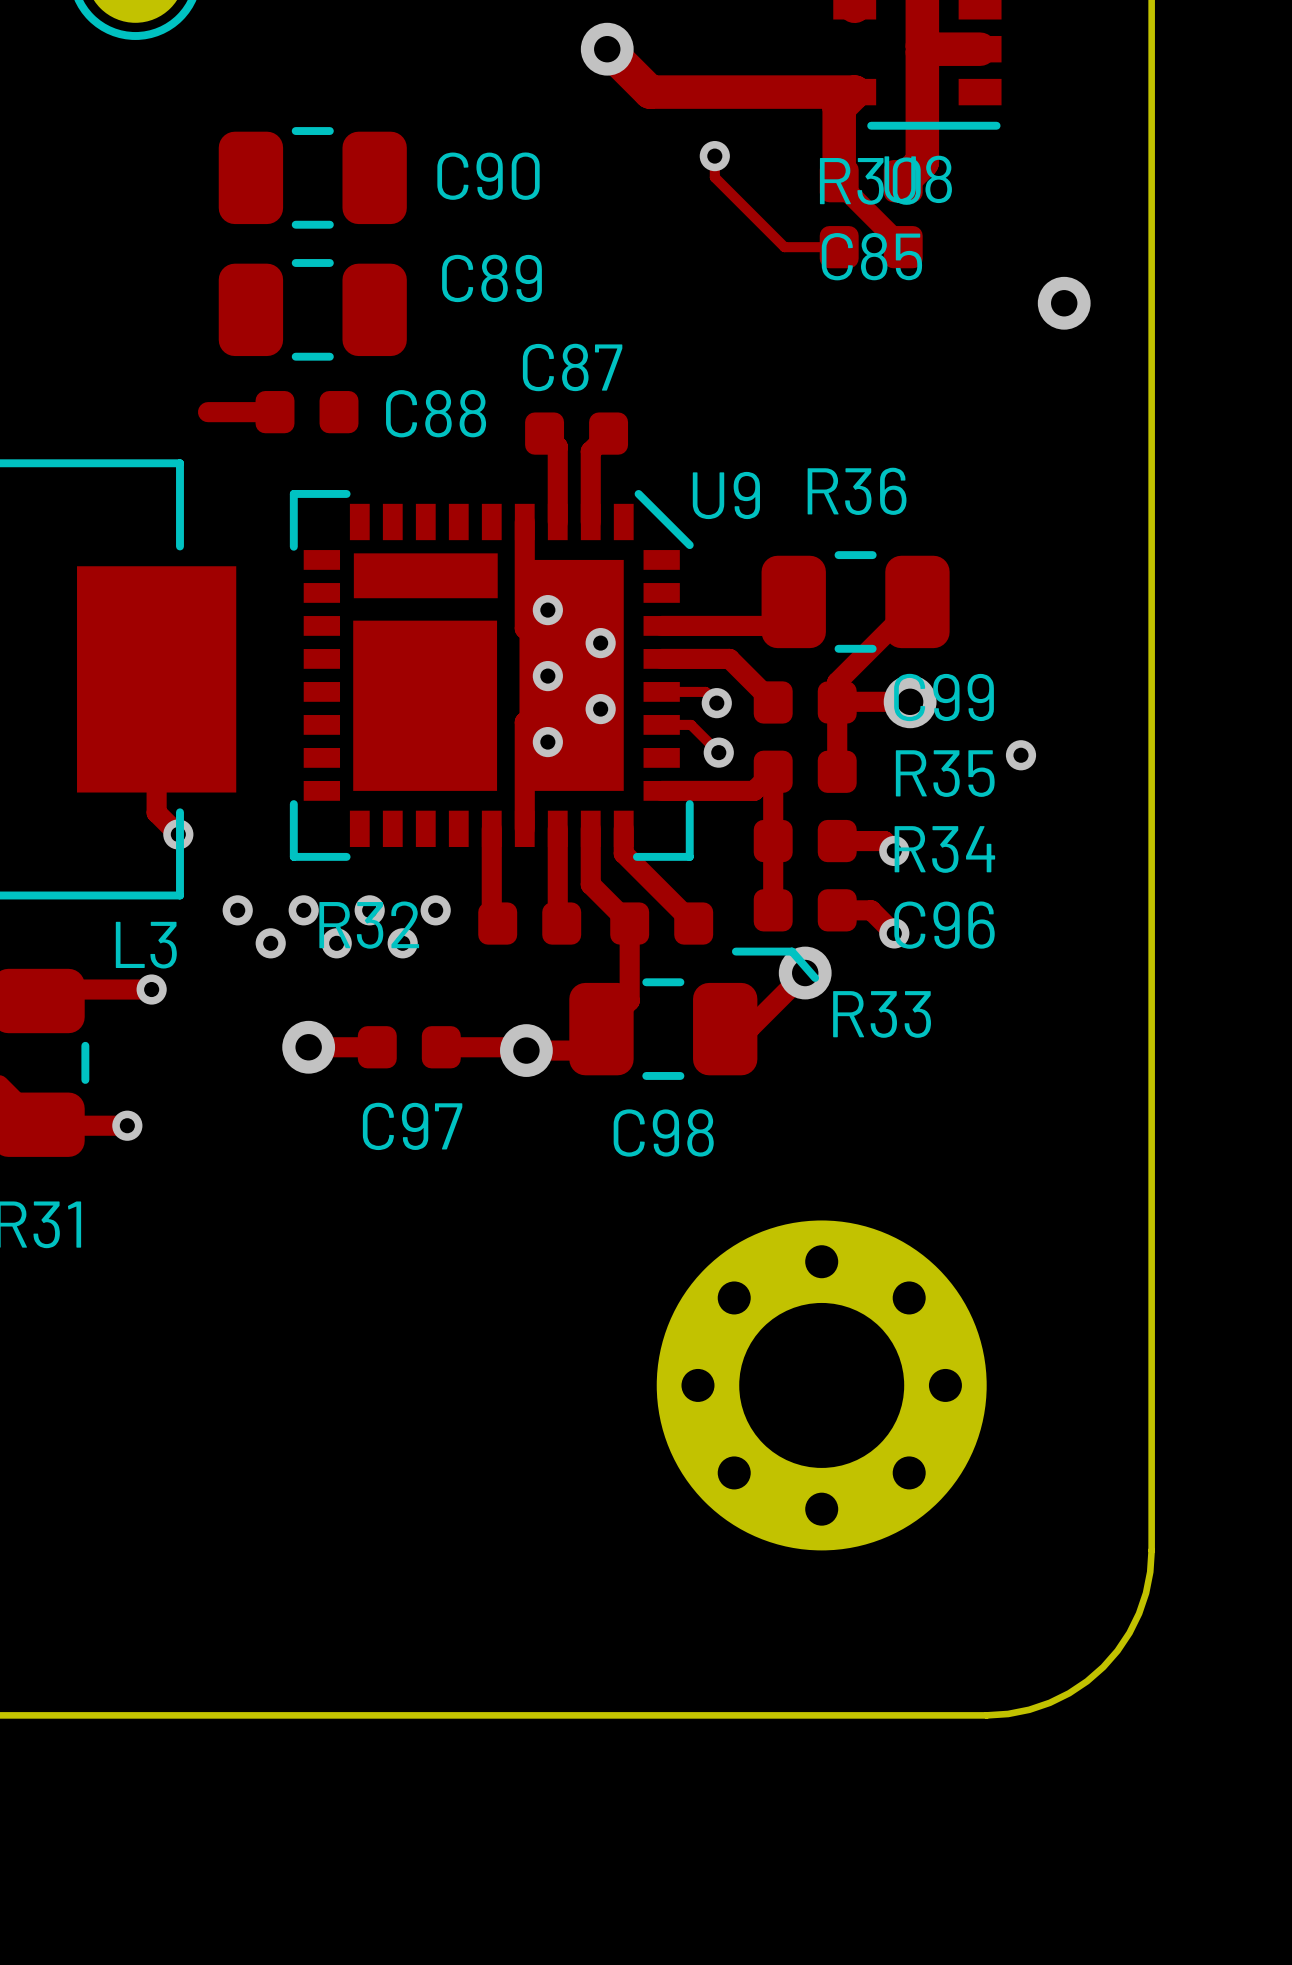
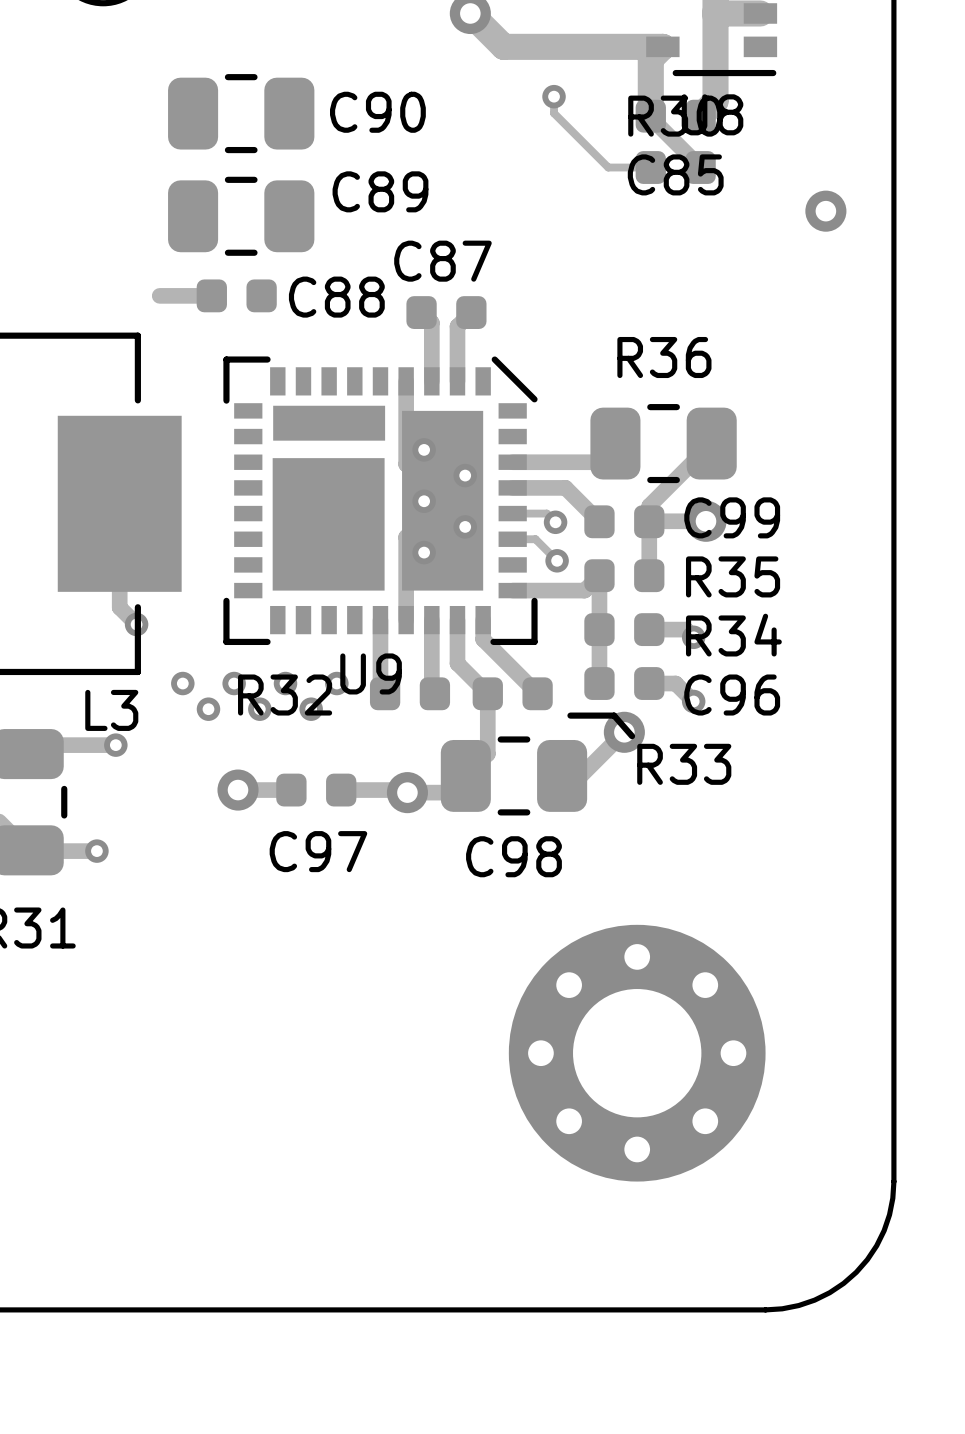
U9 name position: U9 (726, 495) -> U9 (371, 673)
via: (1020, 755) -> none

